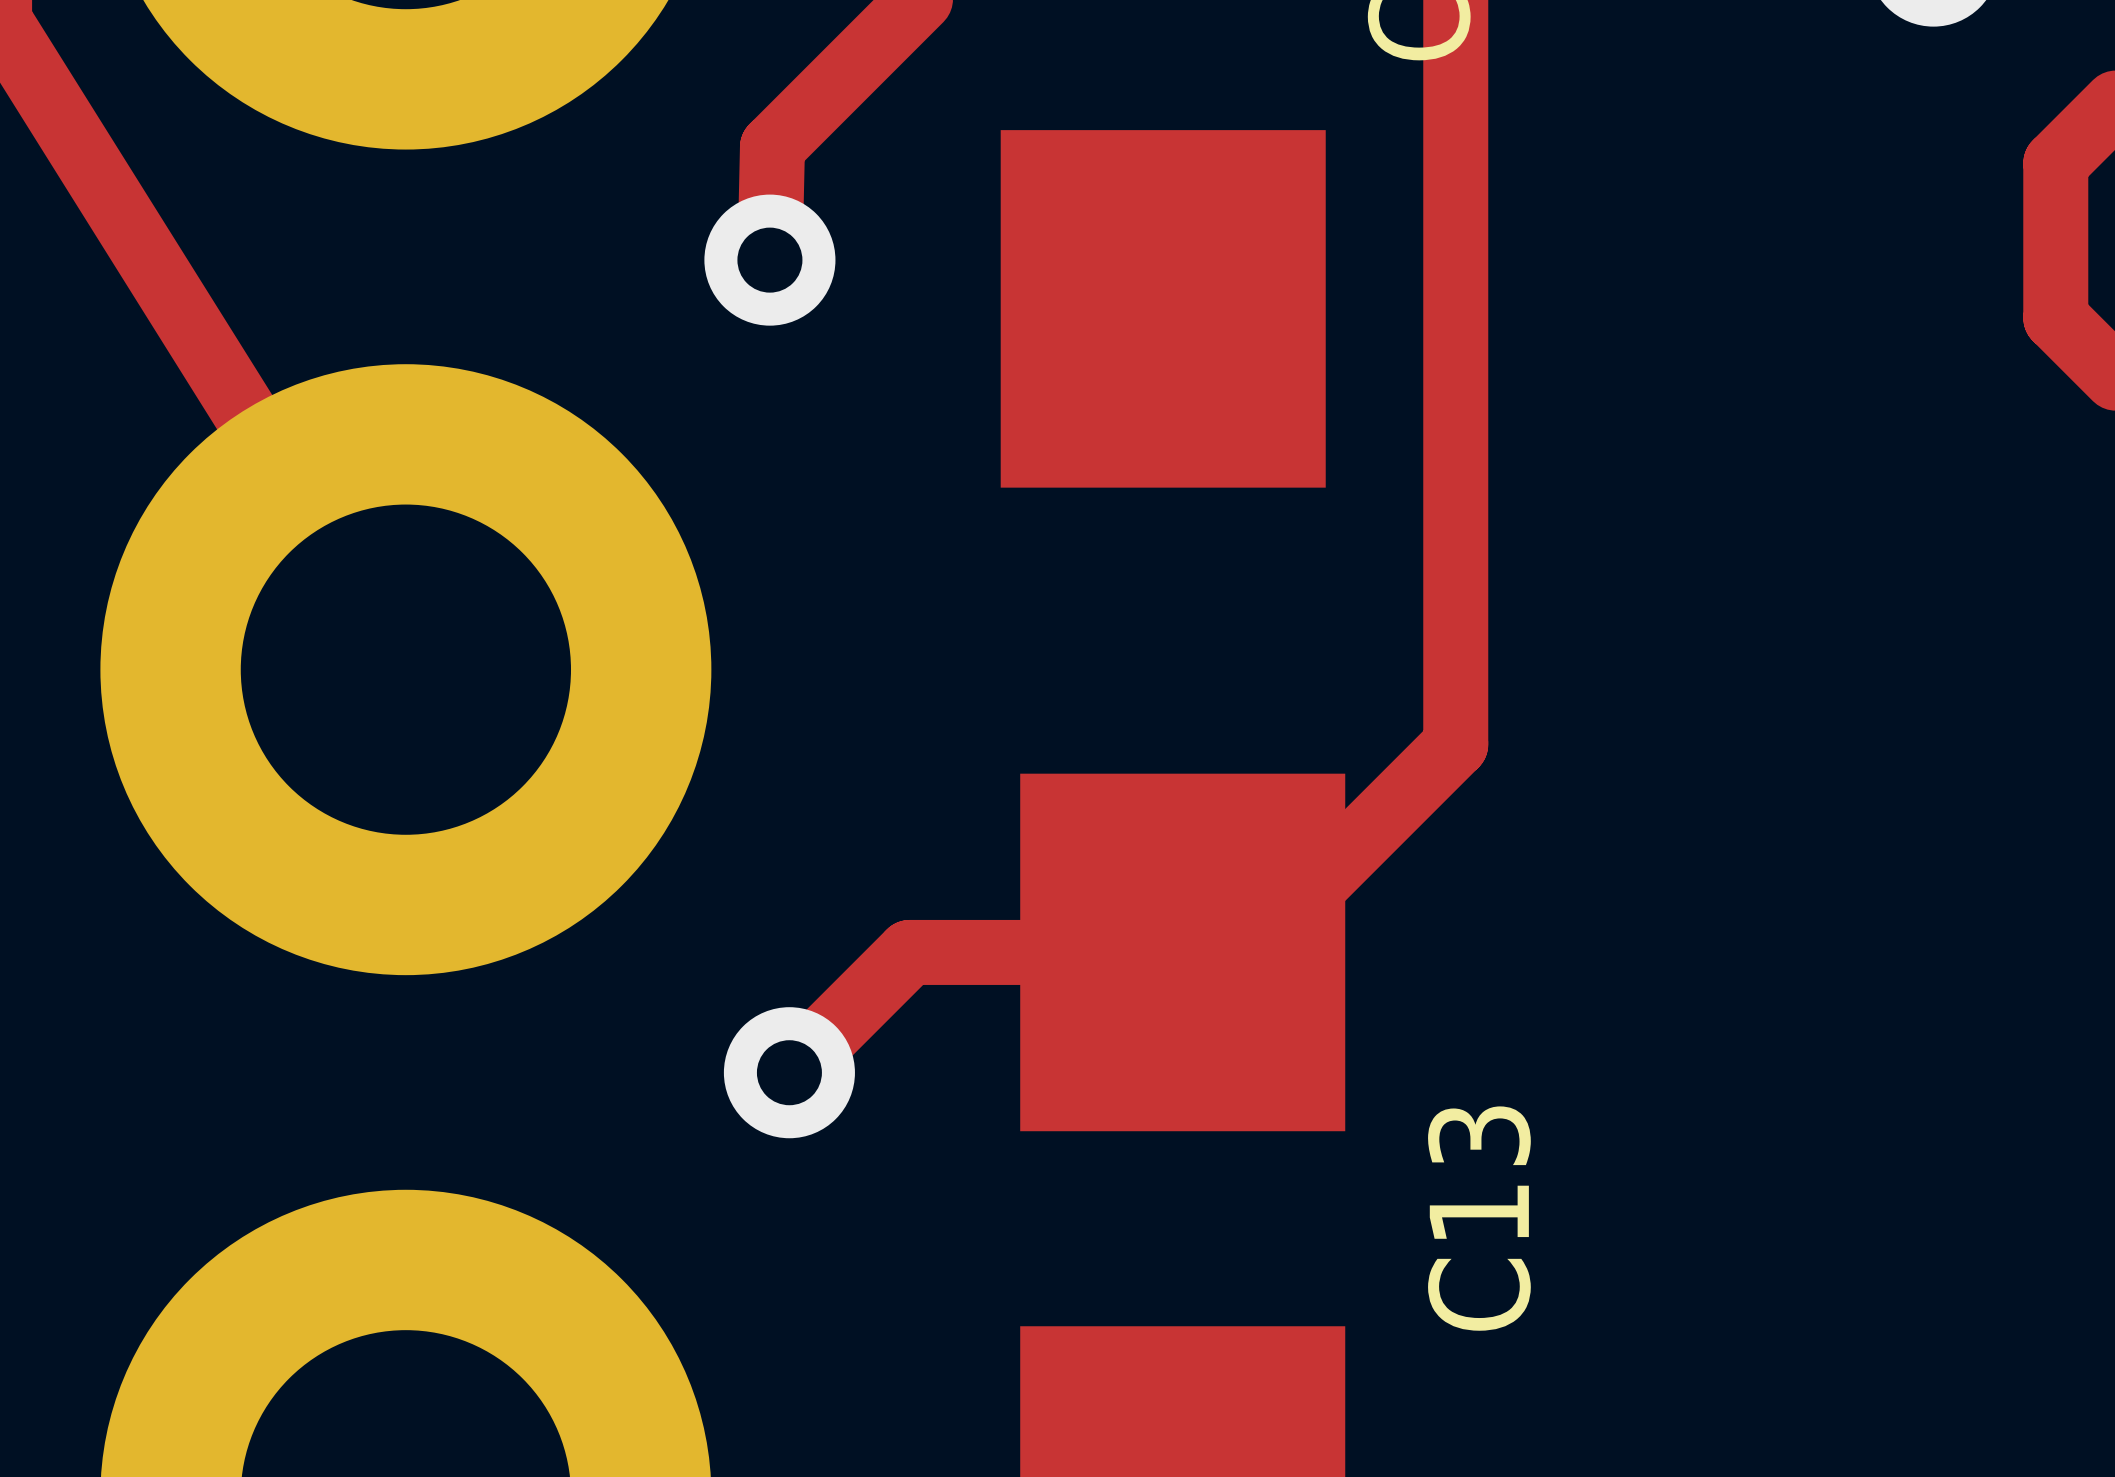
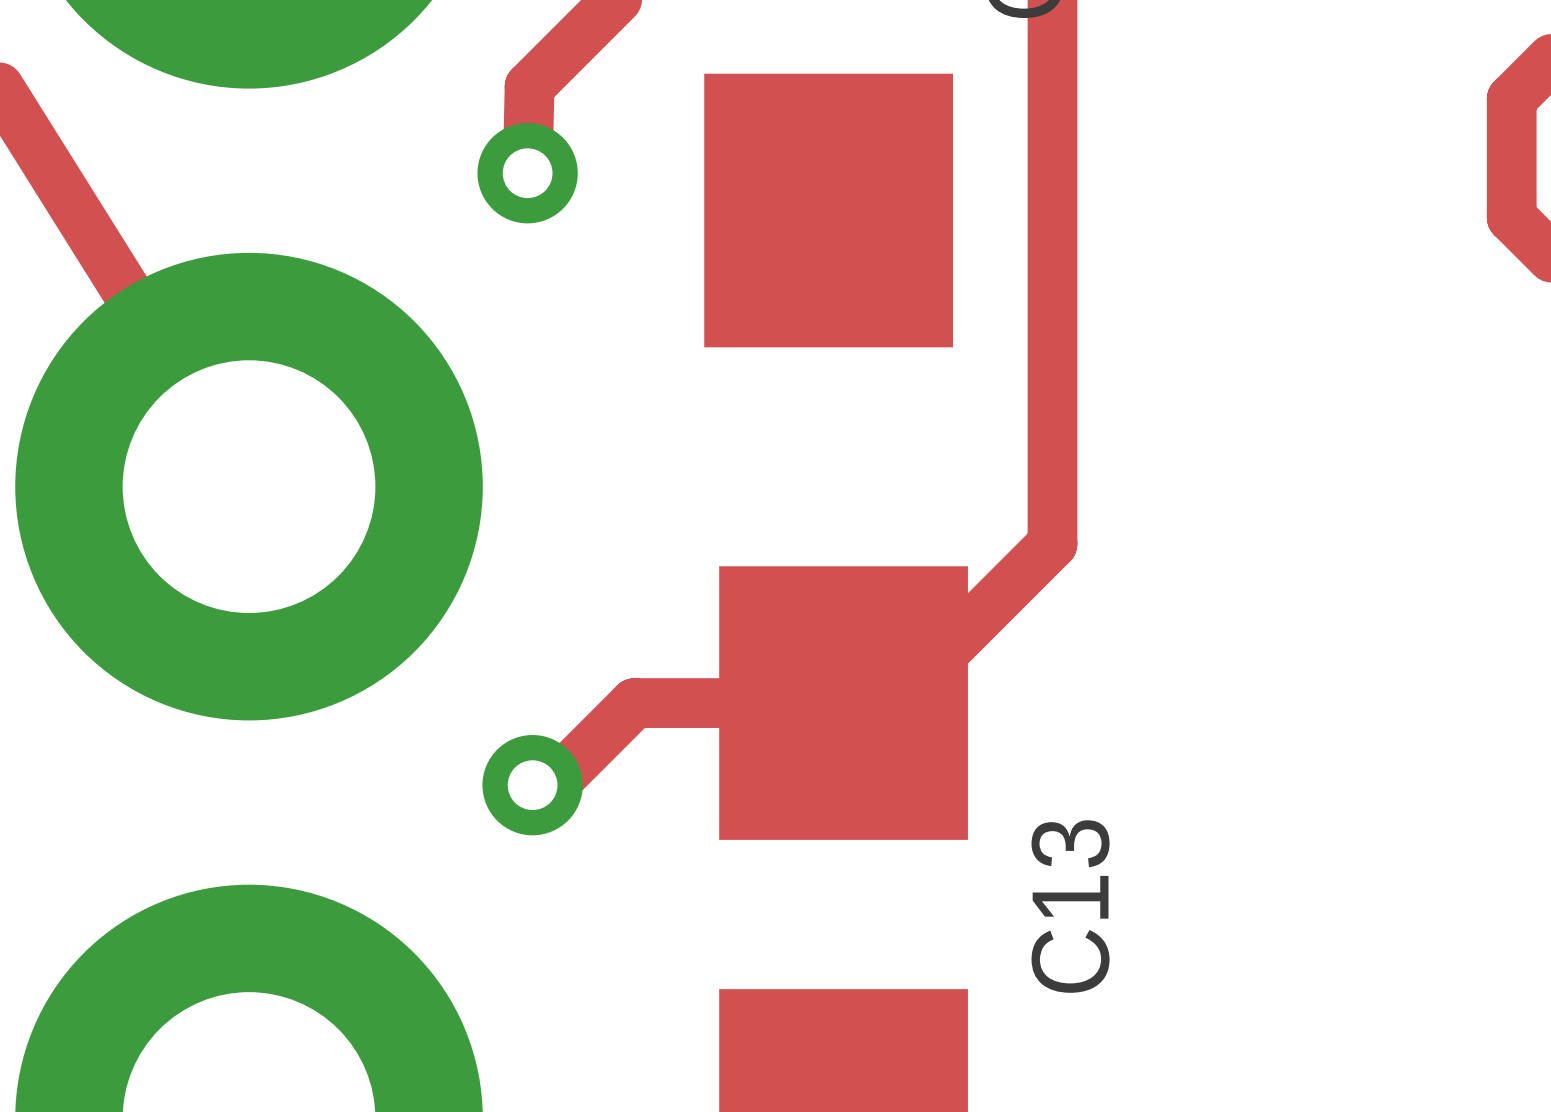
via position: (789, 1072) -> (532, 785)

